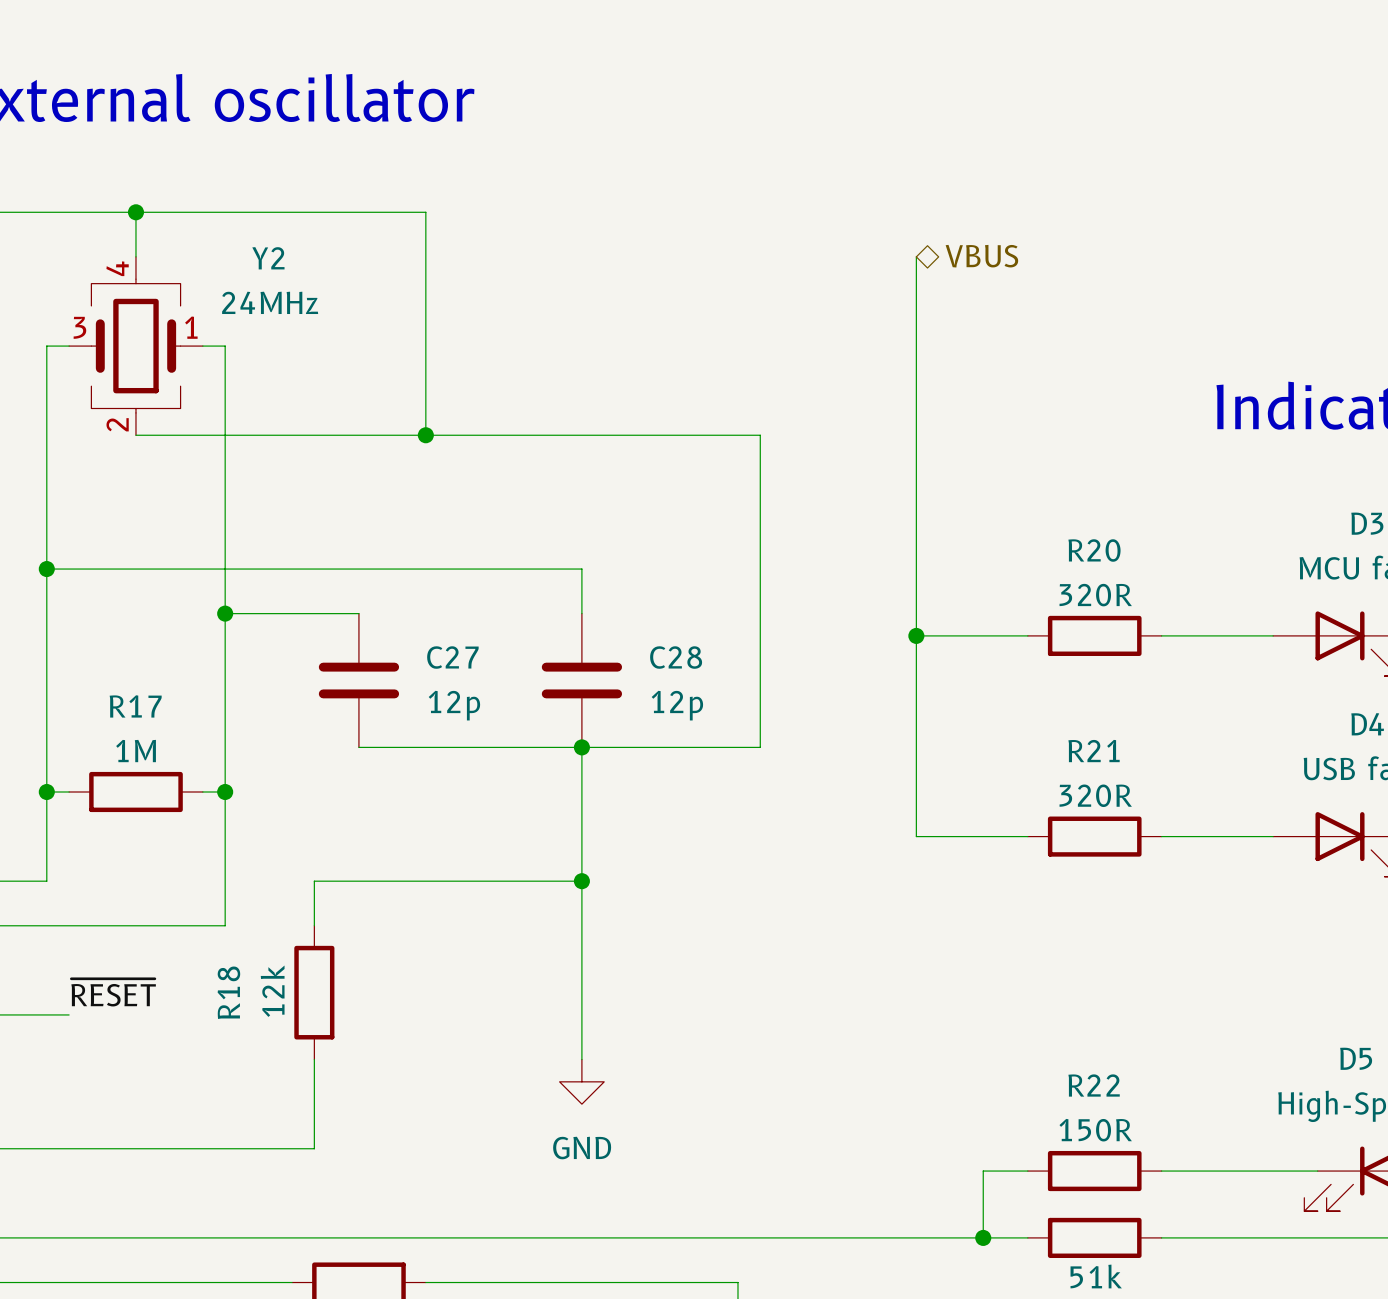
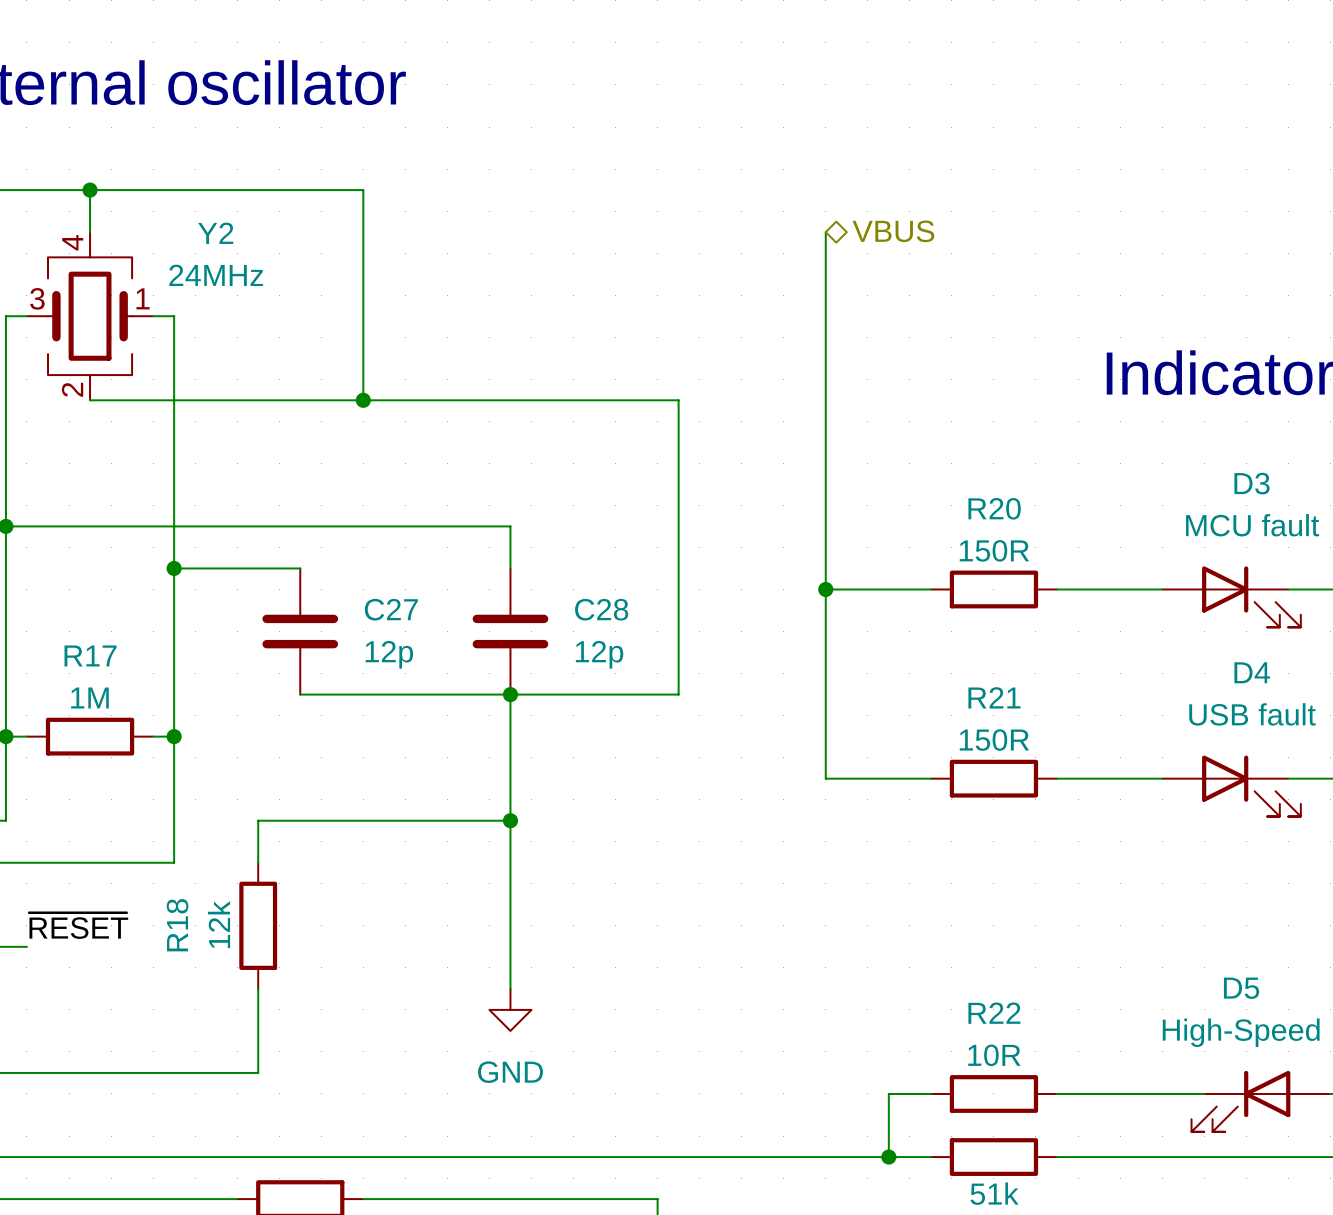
R20 value: 320R (1095, 595) -> 150R (994, 550)
R21 value: 320R (1095, 795) -> 150R (994, 740)
R22 value: 150R (1095, 1130) -> 10R (994, 1055)

